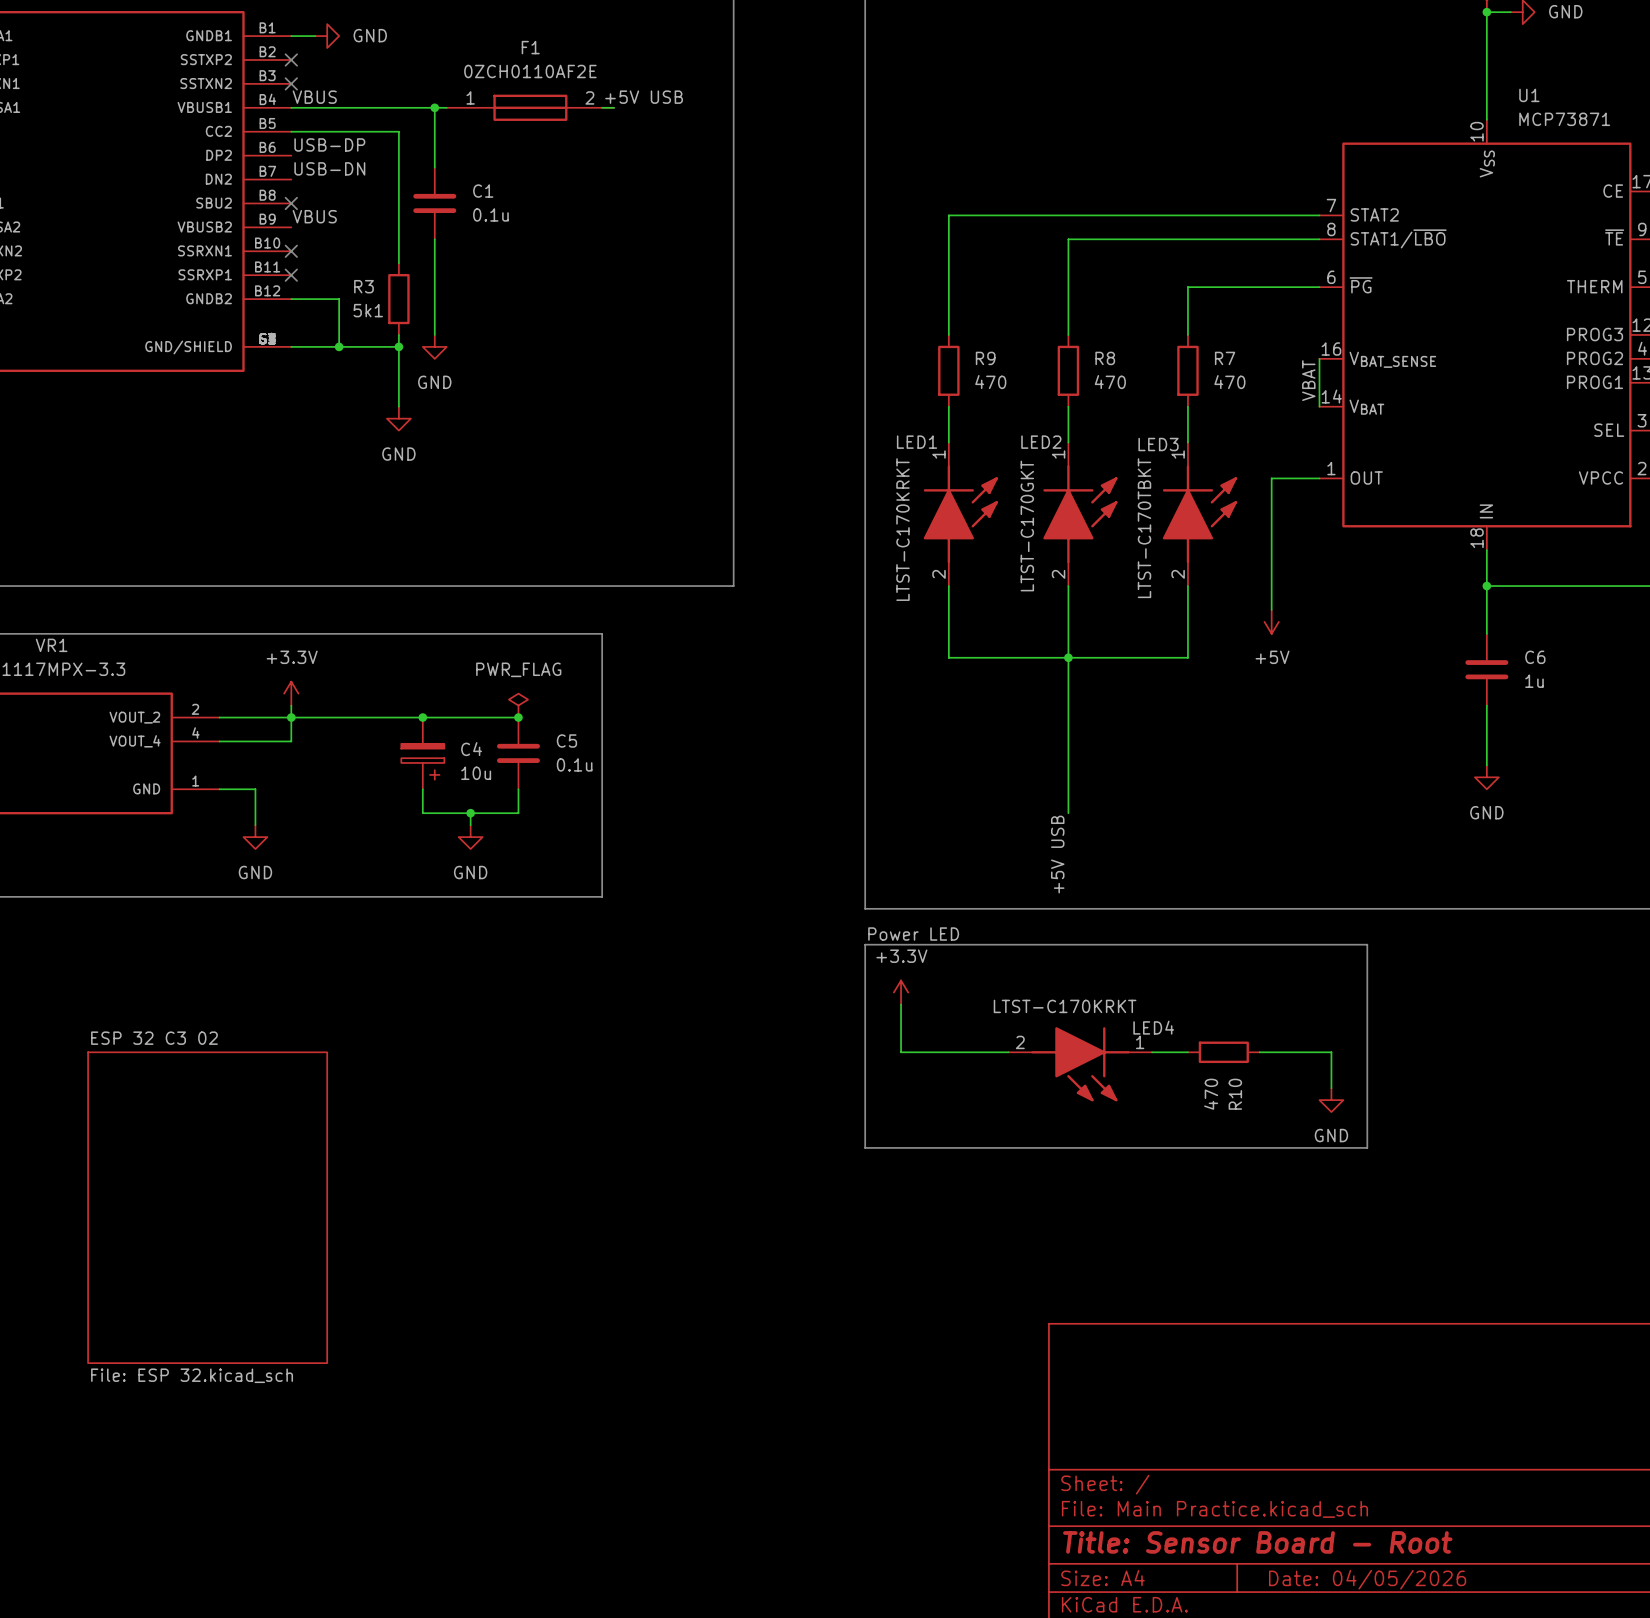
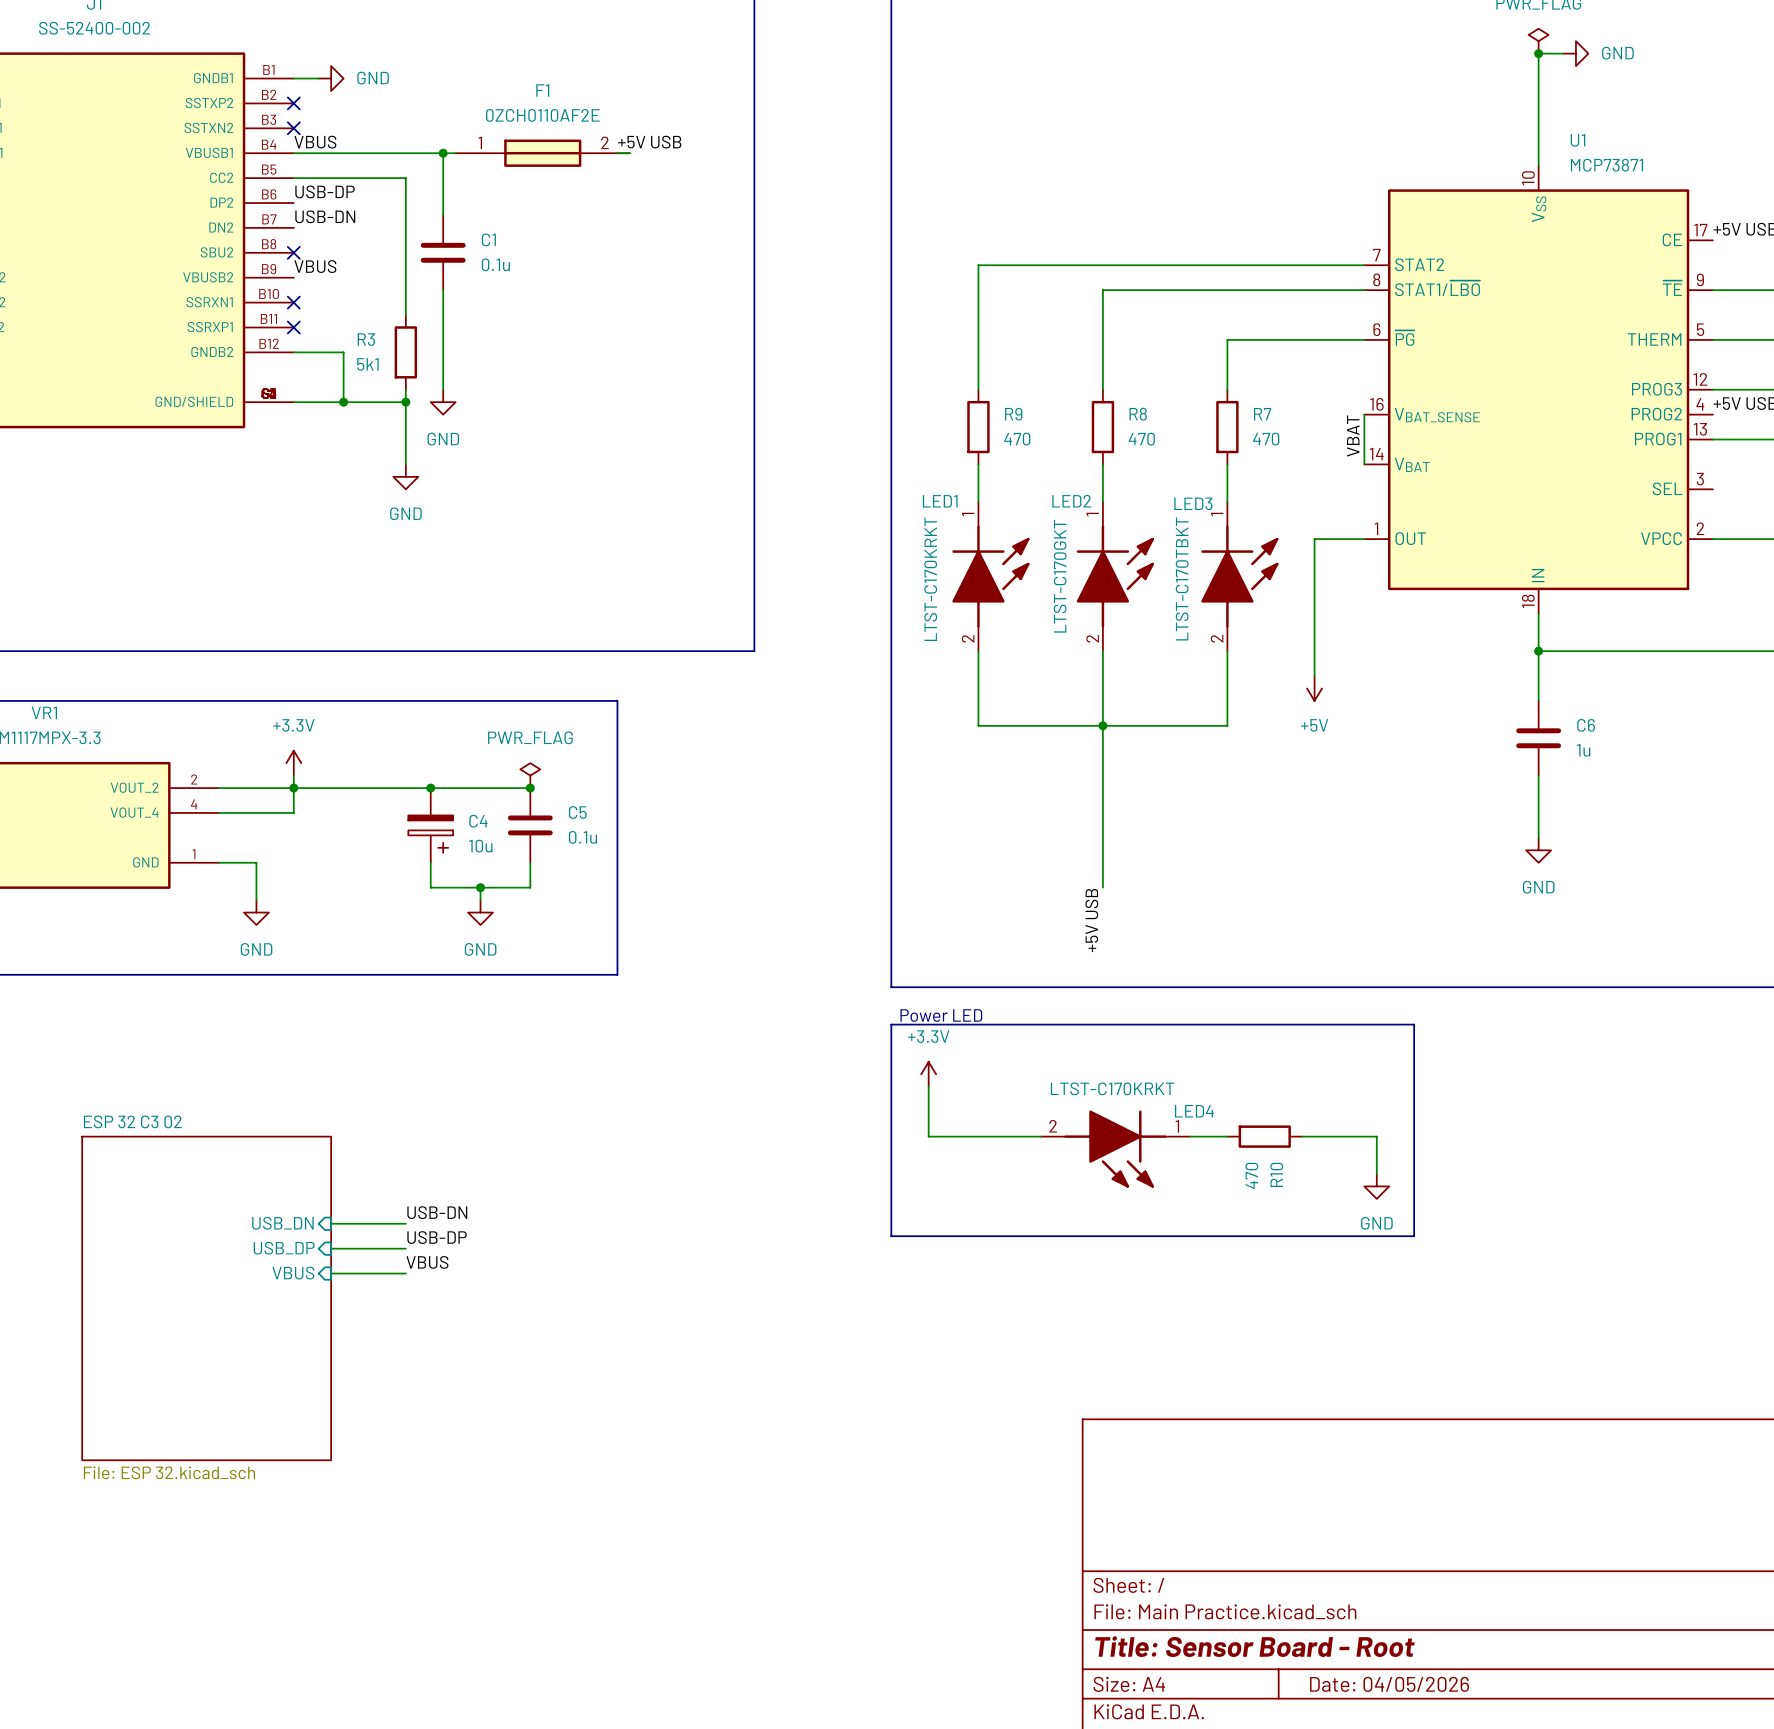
label: Power LED (913, 934) -> none
text: none -> Power LED (941, 1015)
label: none -> USB-DN (437, 1212)
wire: none -> (331, 1223) (405, 1223)
sheet pin: none -> USB_DN (282, 1223)
label: none -> USB-DP (437, 1237)
wire: none -> (331, 1248) (405, 1248)
sheet pin: none -> USB_DP (284, 1248)
label: none -> VBUS (427, 1262)
sheet pin: none -> VBUS (293, 1273)
wire: none -> (331, 1273) (405, 1273)

